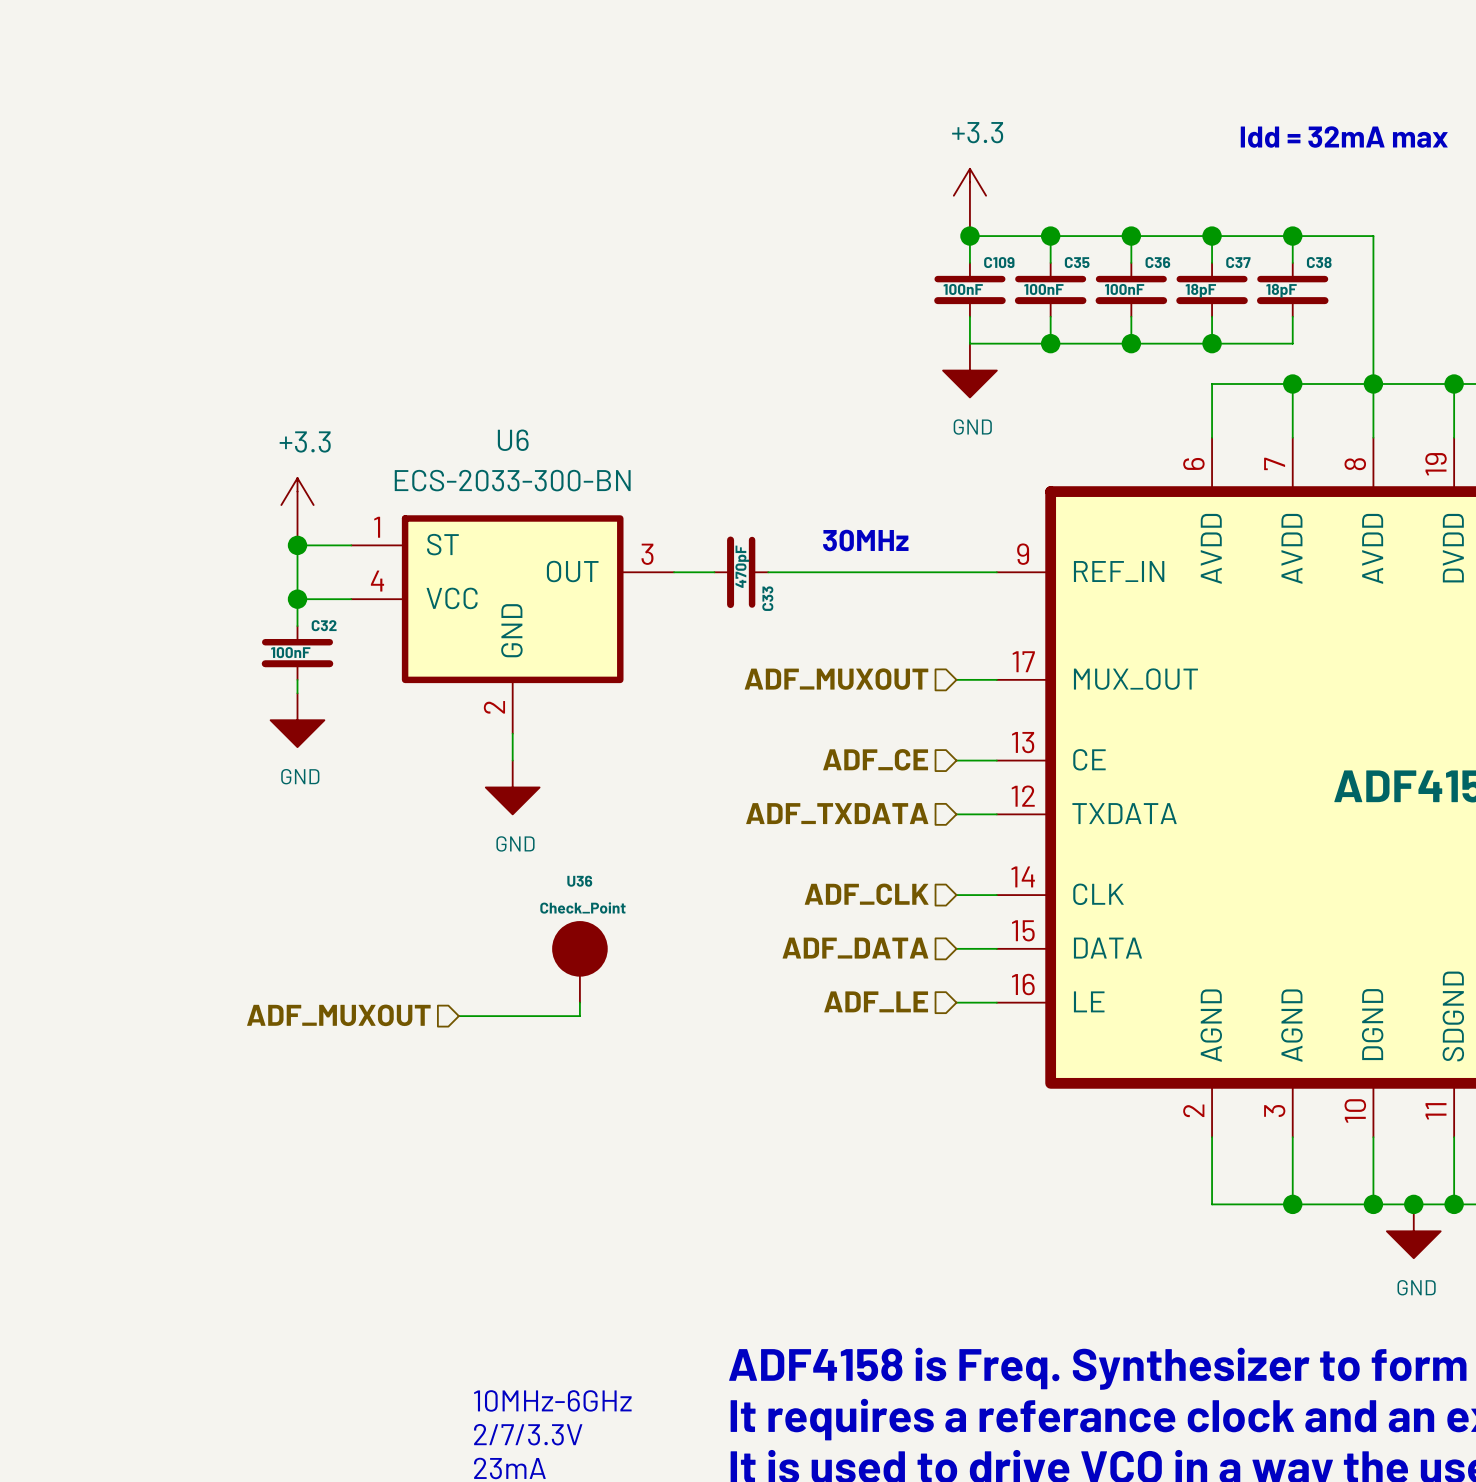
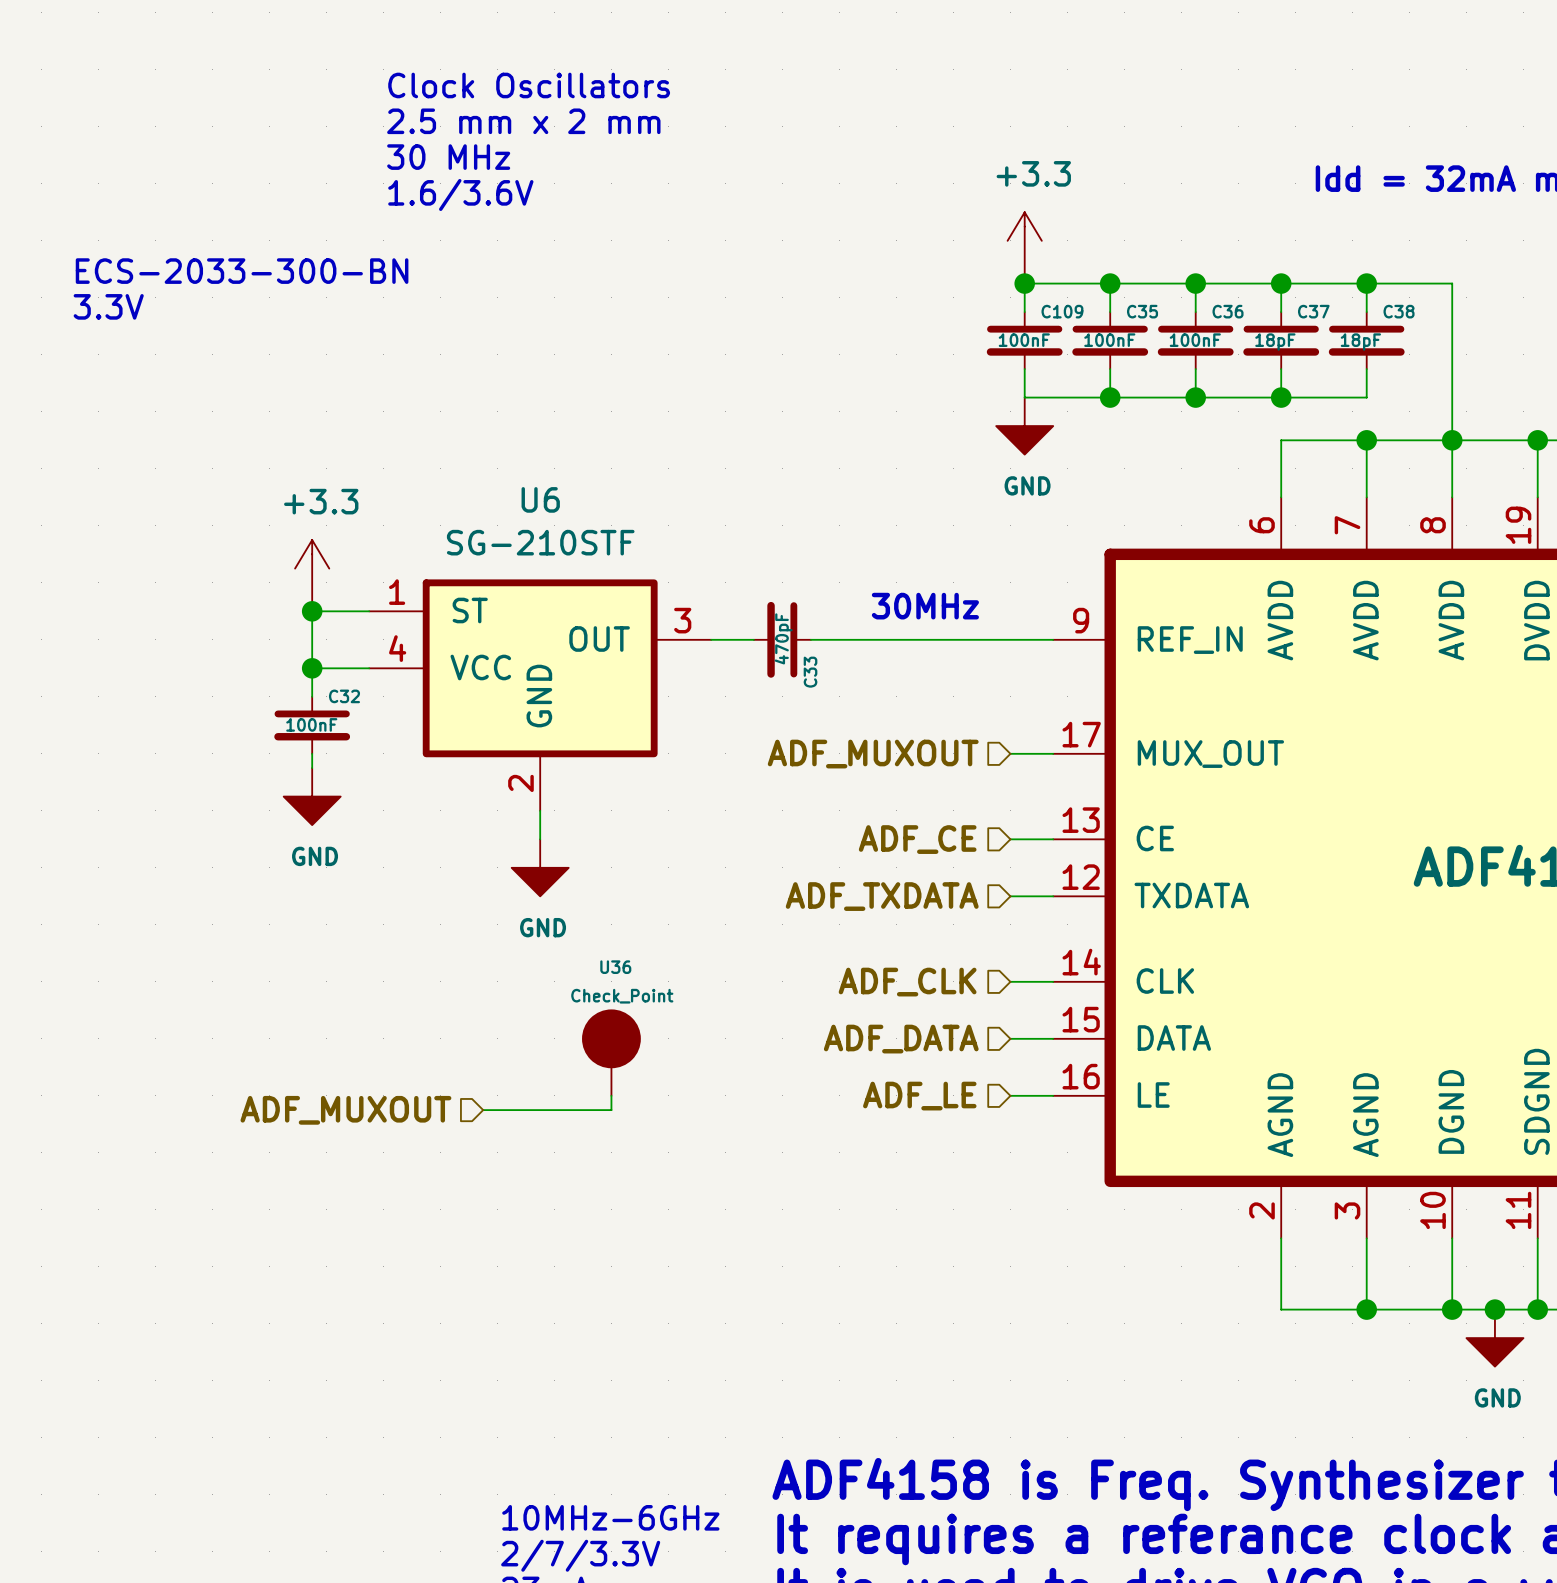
text: none -> Clock Oscillators (529, 85)
text: none -> 2.5 mm x 2 mm (523, 121)
text: none -> 30 MHz (448, 157)
text: none -> 1.6/3.6V (460, 194)
text: none -> ECS-2033-300-BN (242, 271)
text: none -> 3.3V (108, 306)
U6 value: ECS-2033-300-BN (512, 480) -> SG-210STF (540, 542)

